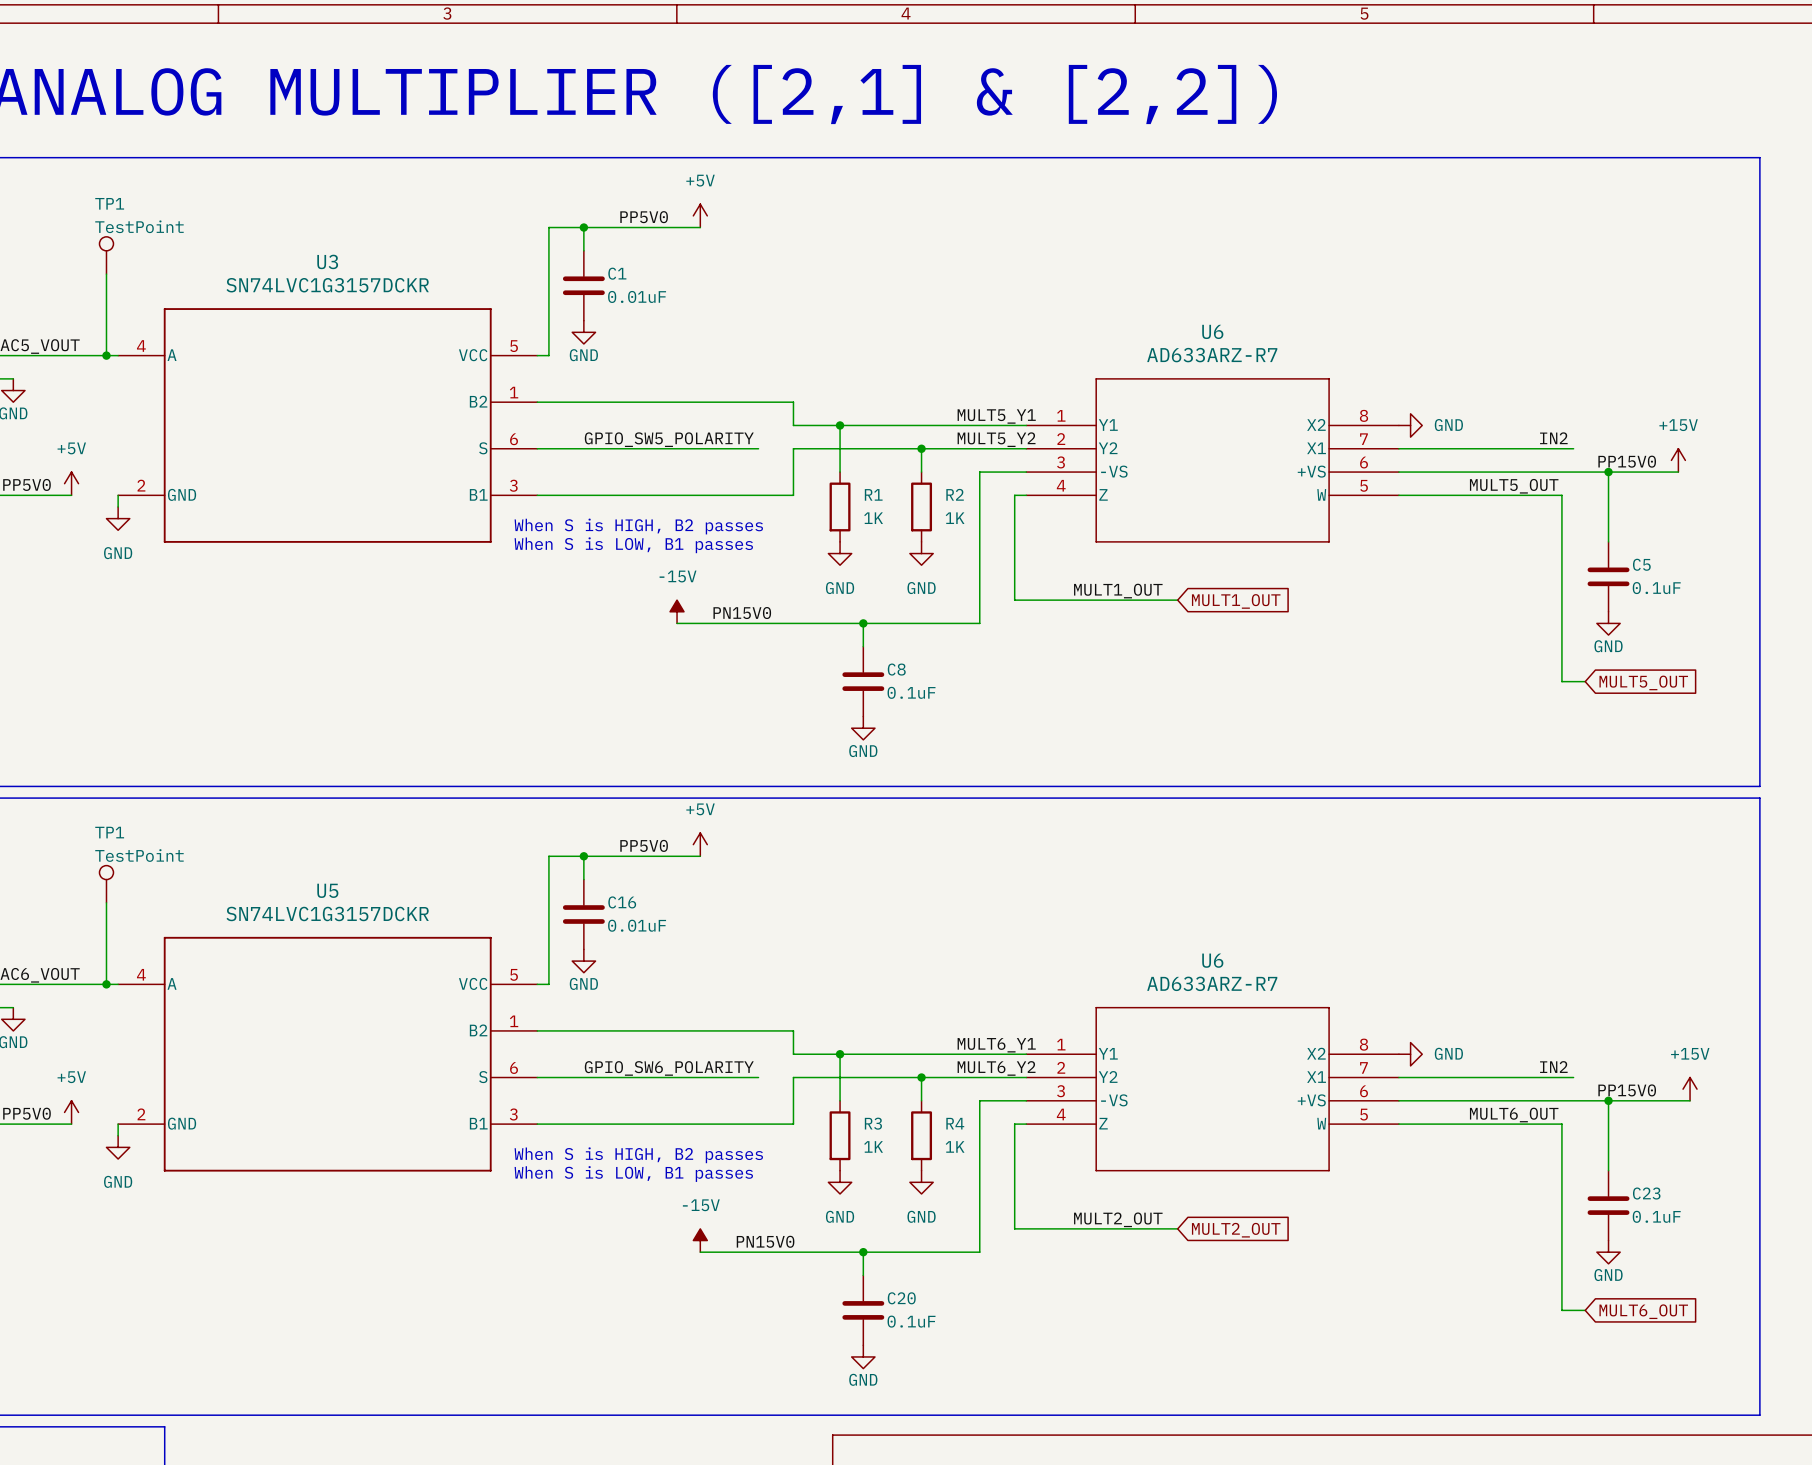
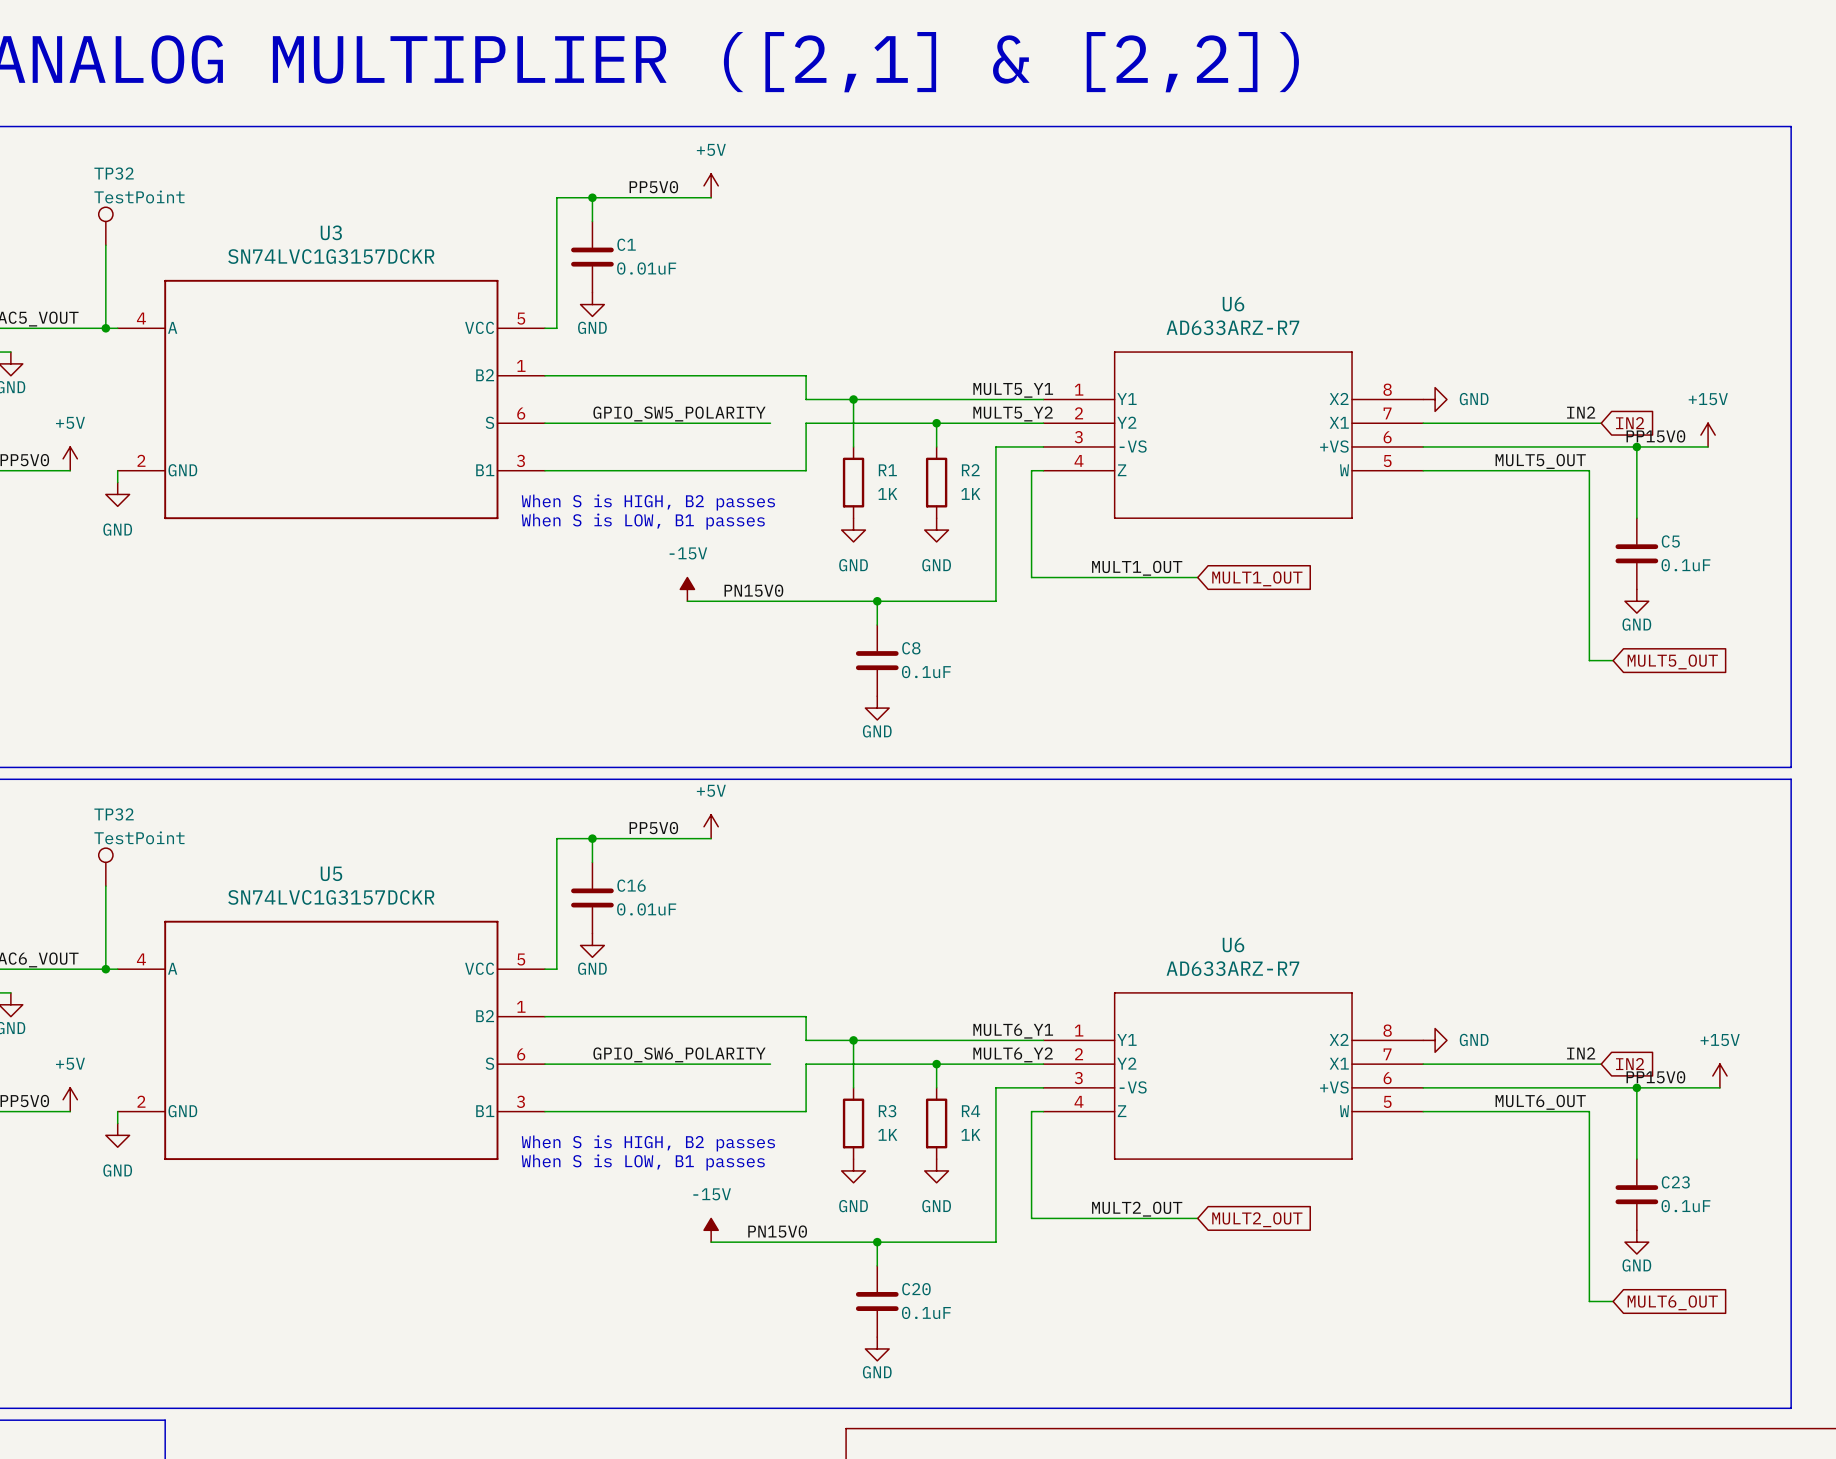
TP1 name: TP1 (109, 203) -> TP32 (114, 173)
global label: none -> IN2 (1630, 423)
TP1 name: TP1 (109, 832) -> TP32 (114, 814)
global label: none -> IN2 (1630, 1064)

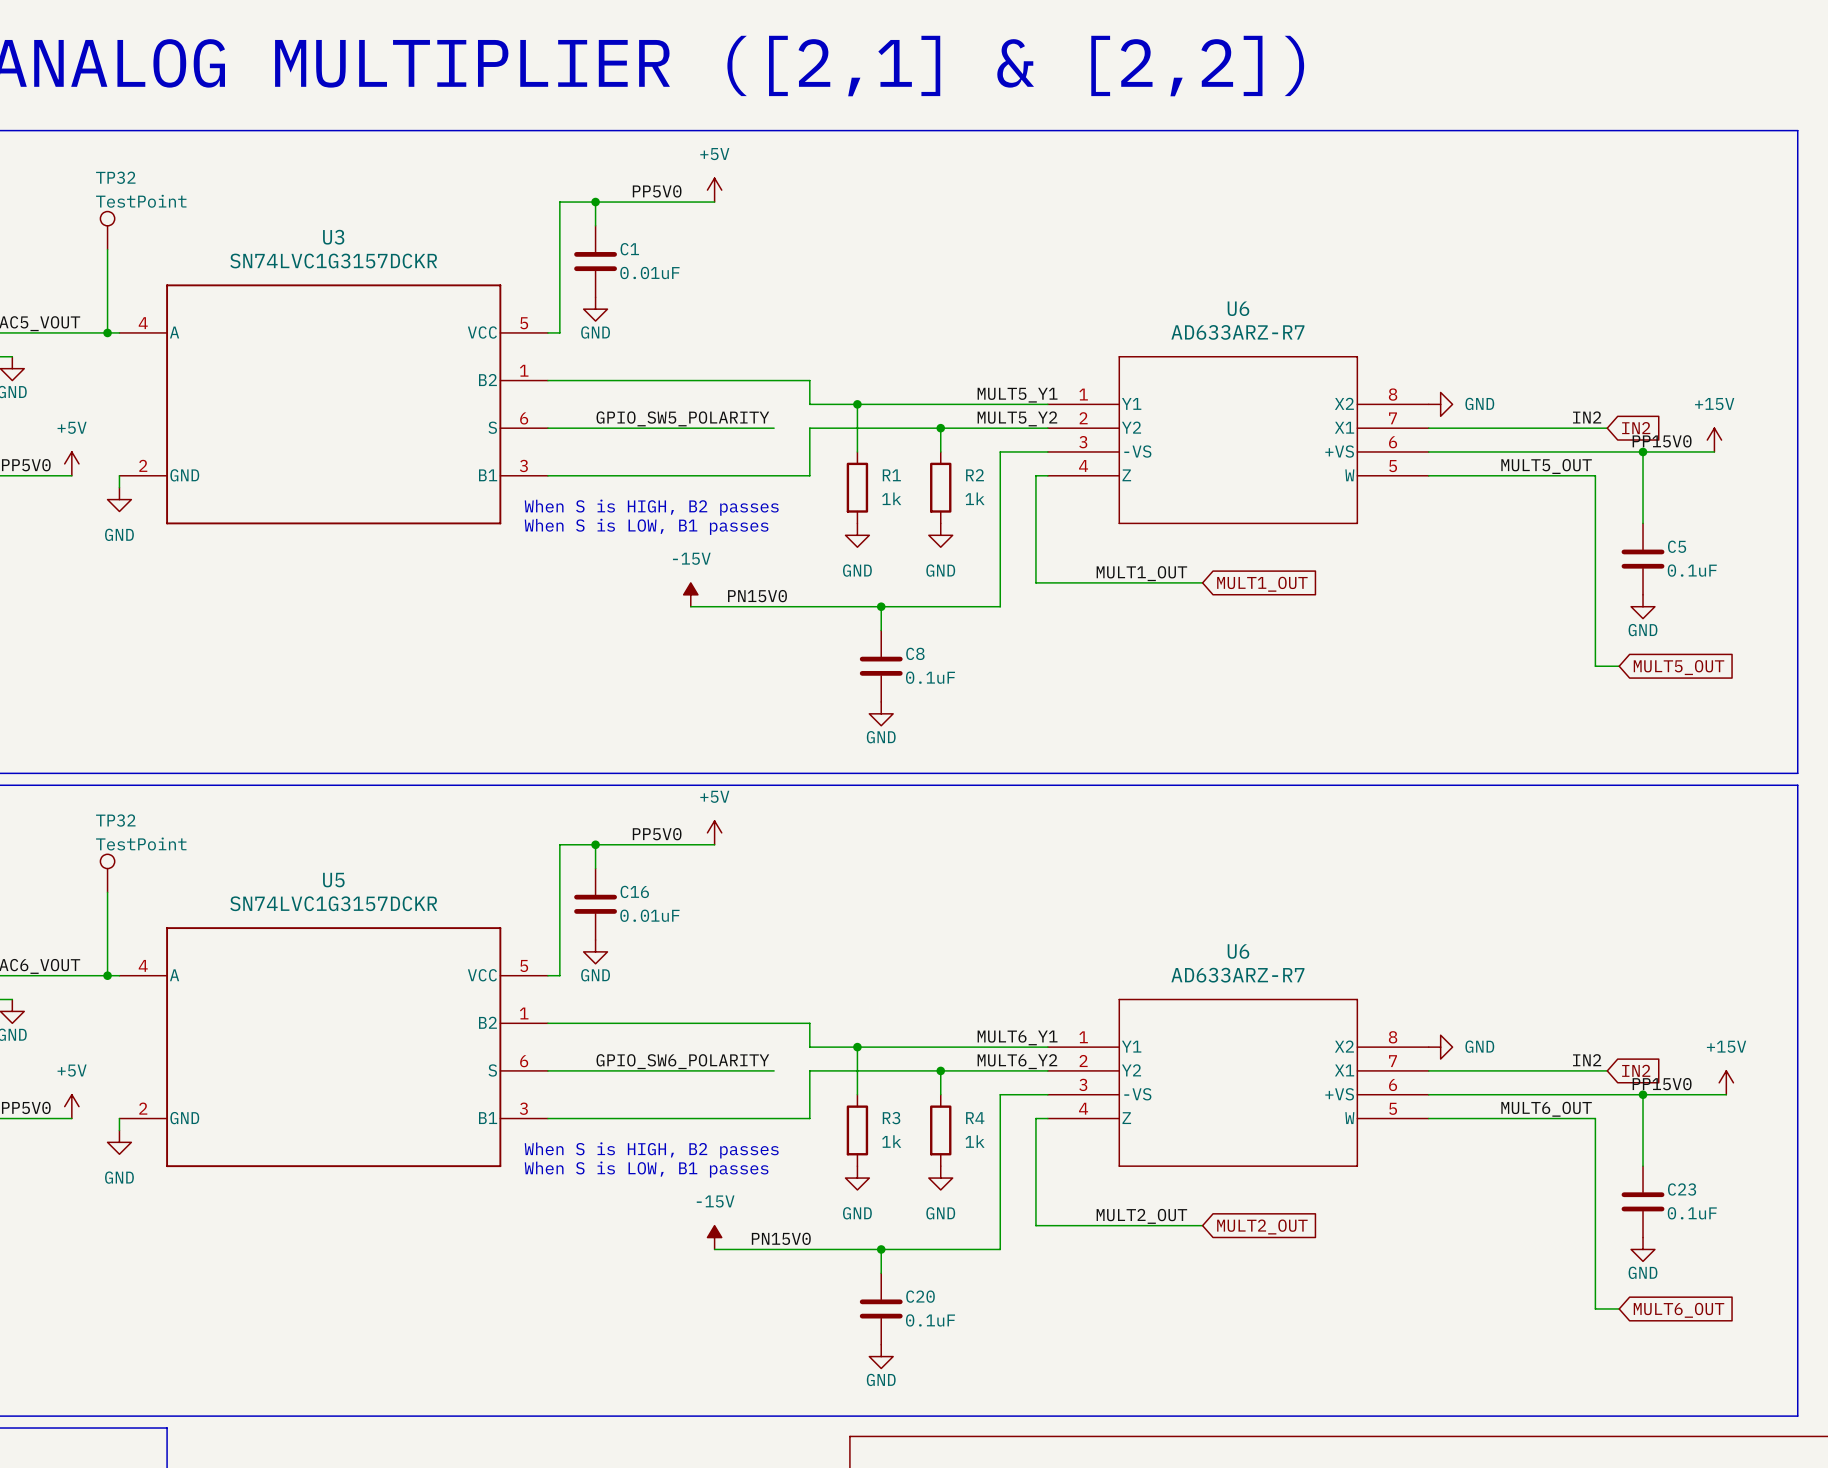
R1 value: 1K (887, 494) -> 1k (891, 498)
R2 value: 1K (970, 494) -> 1k (975, 498)
R3 value: 1K (887, 1134) -> 1k (891, 1141)
R4 value: 1K (970, 1134) -> 1k (975, 1141)

